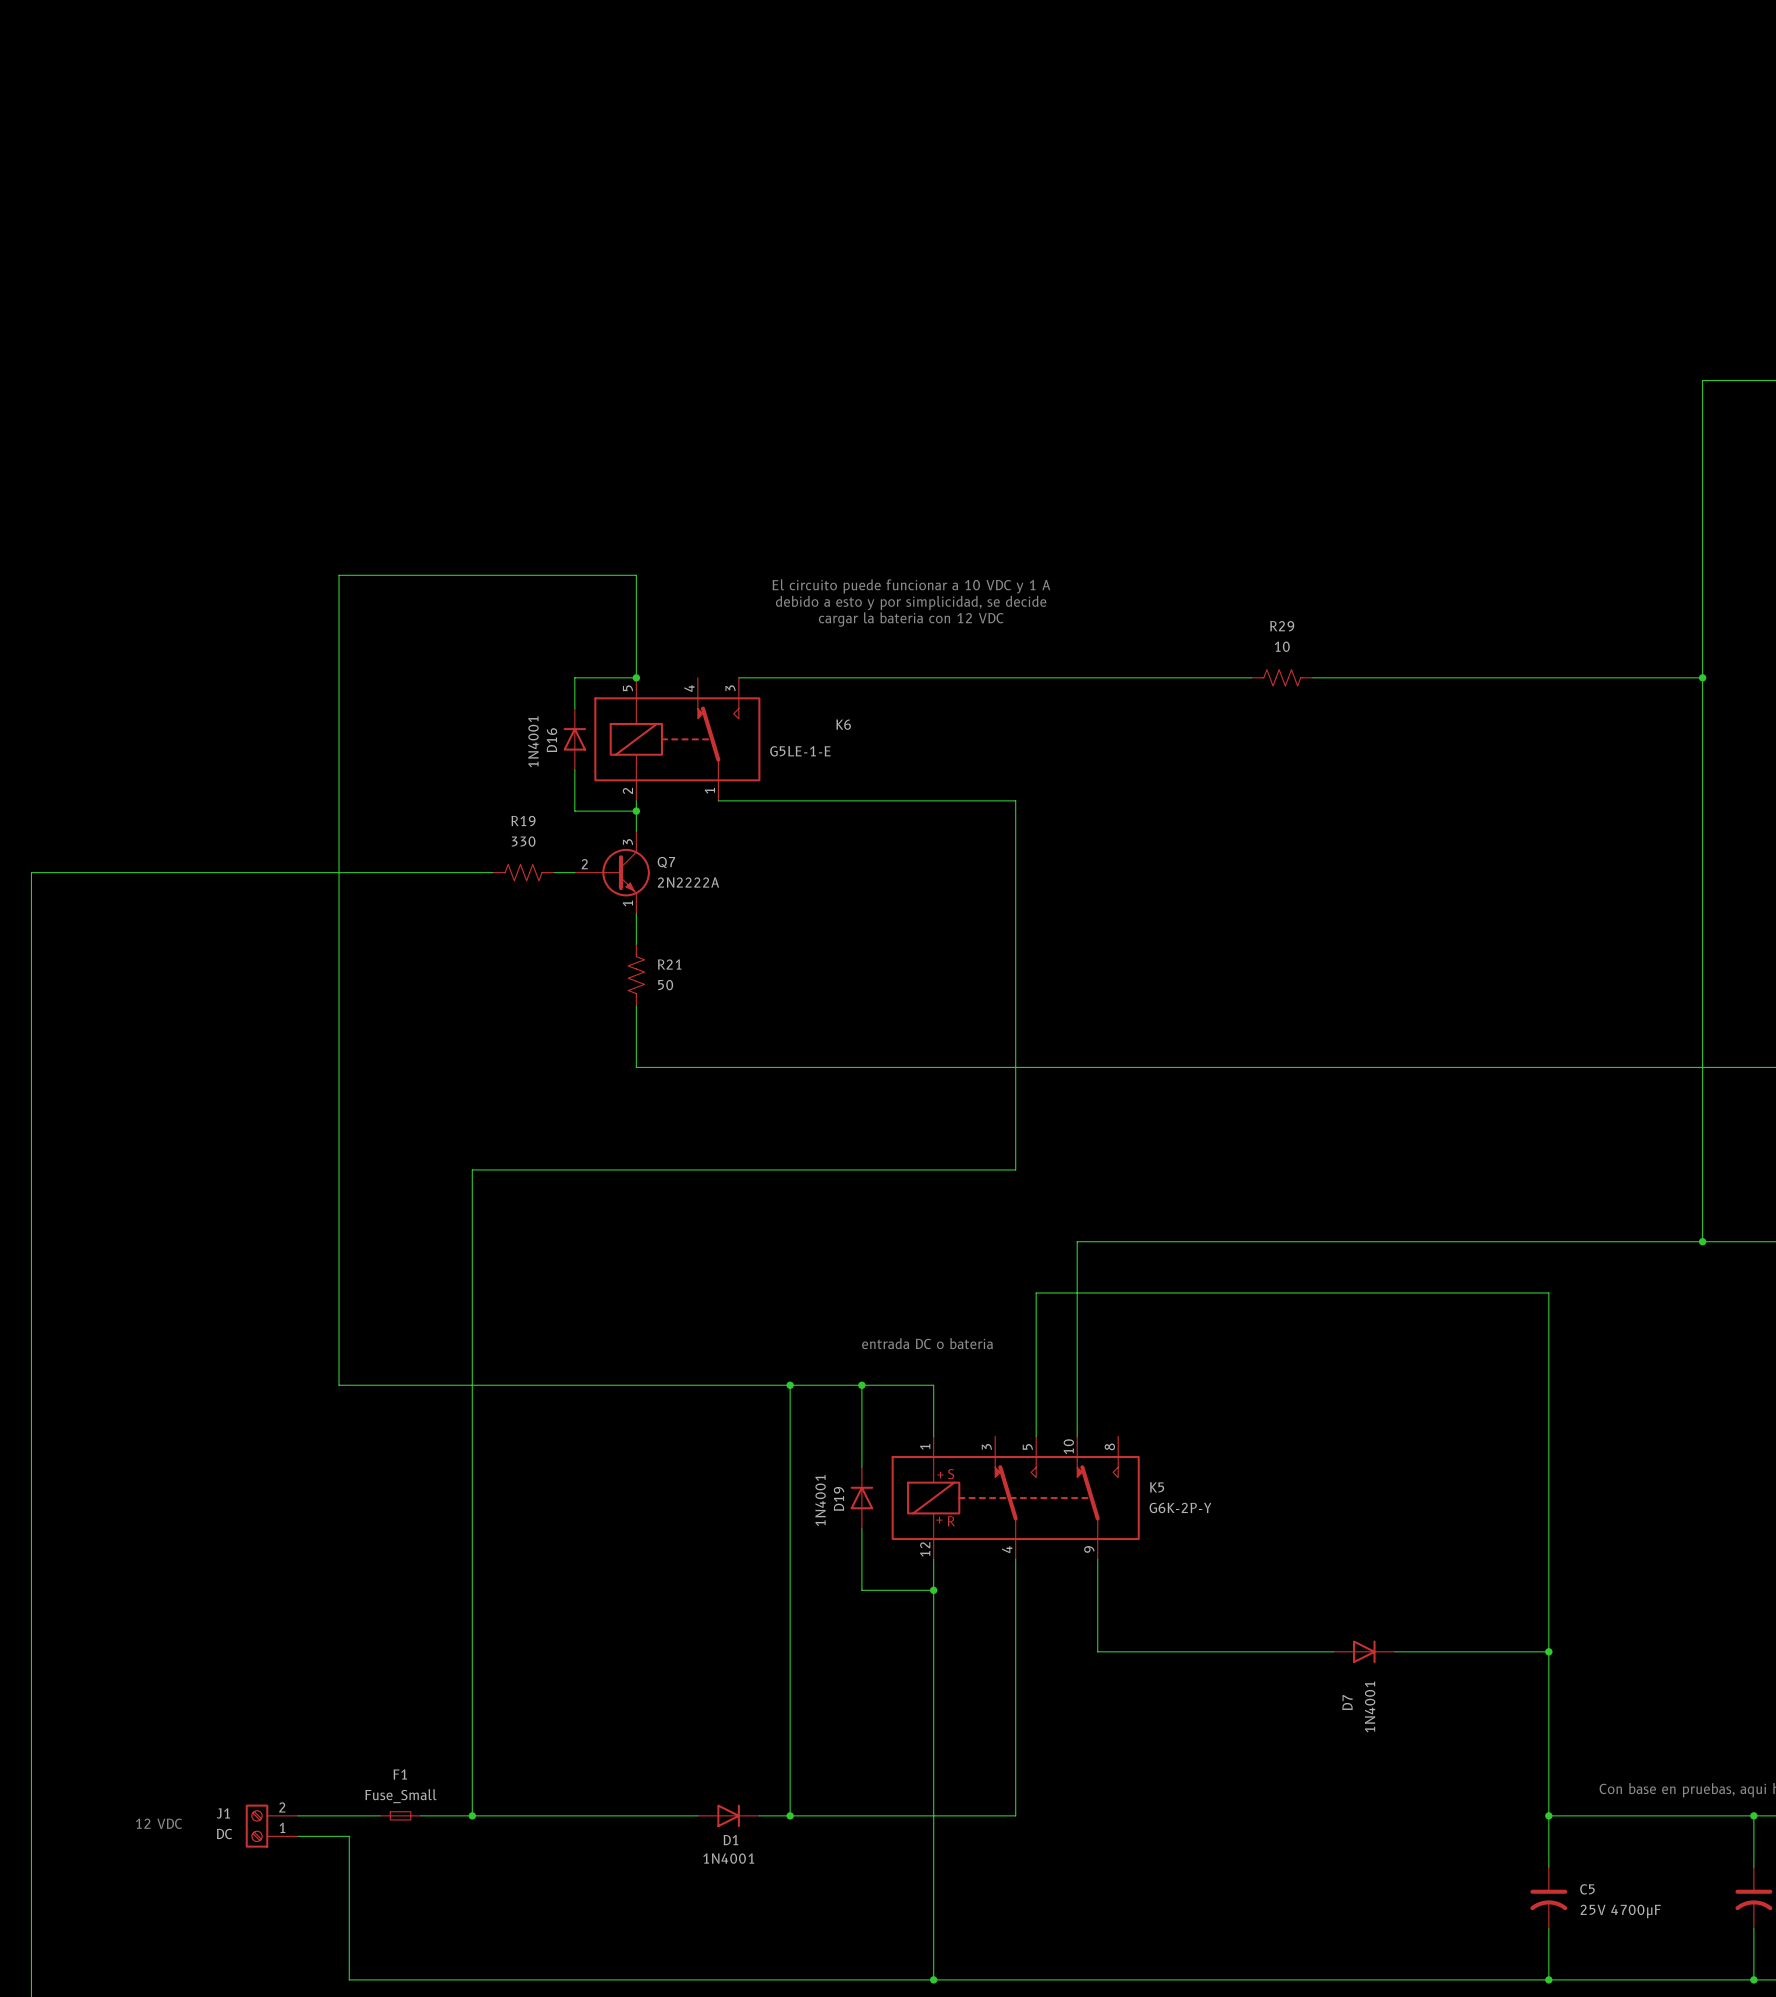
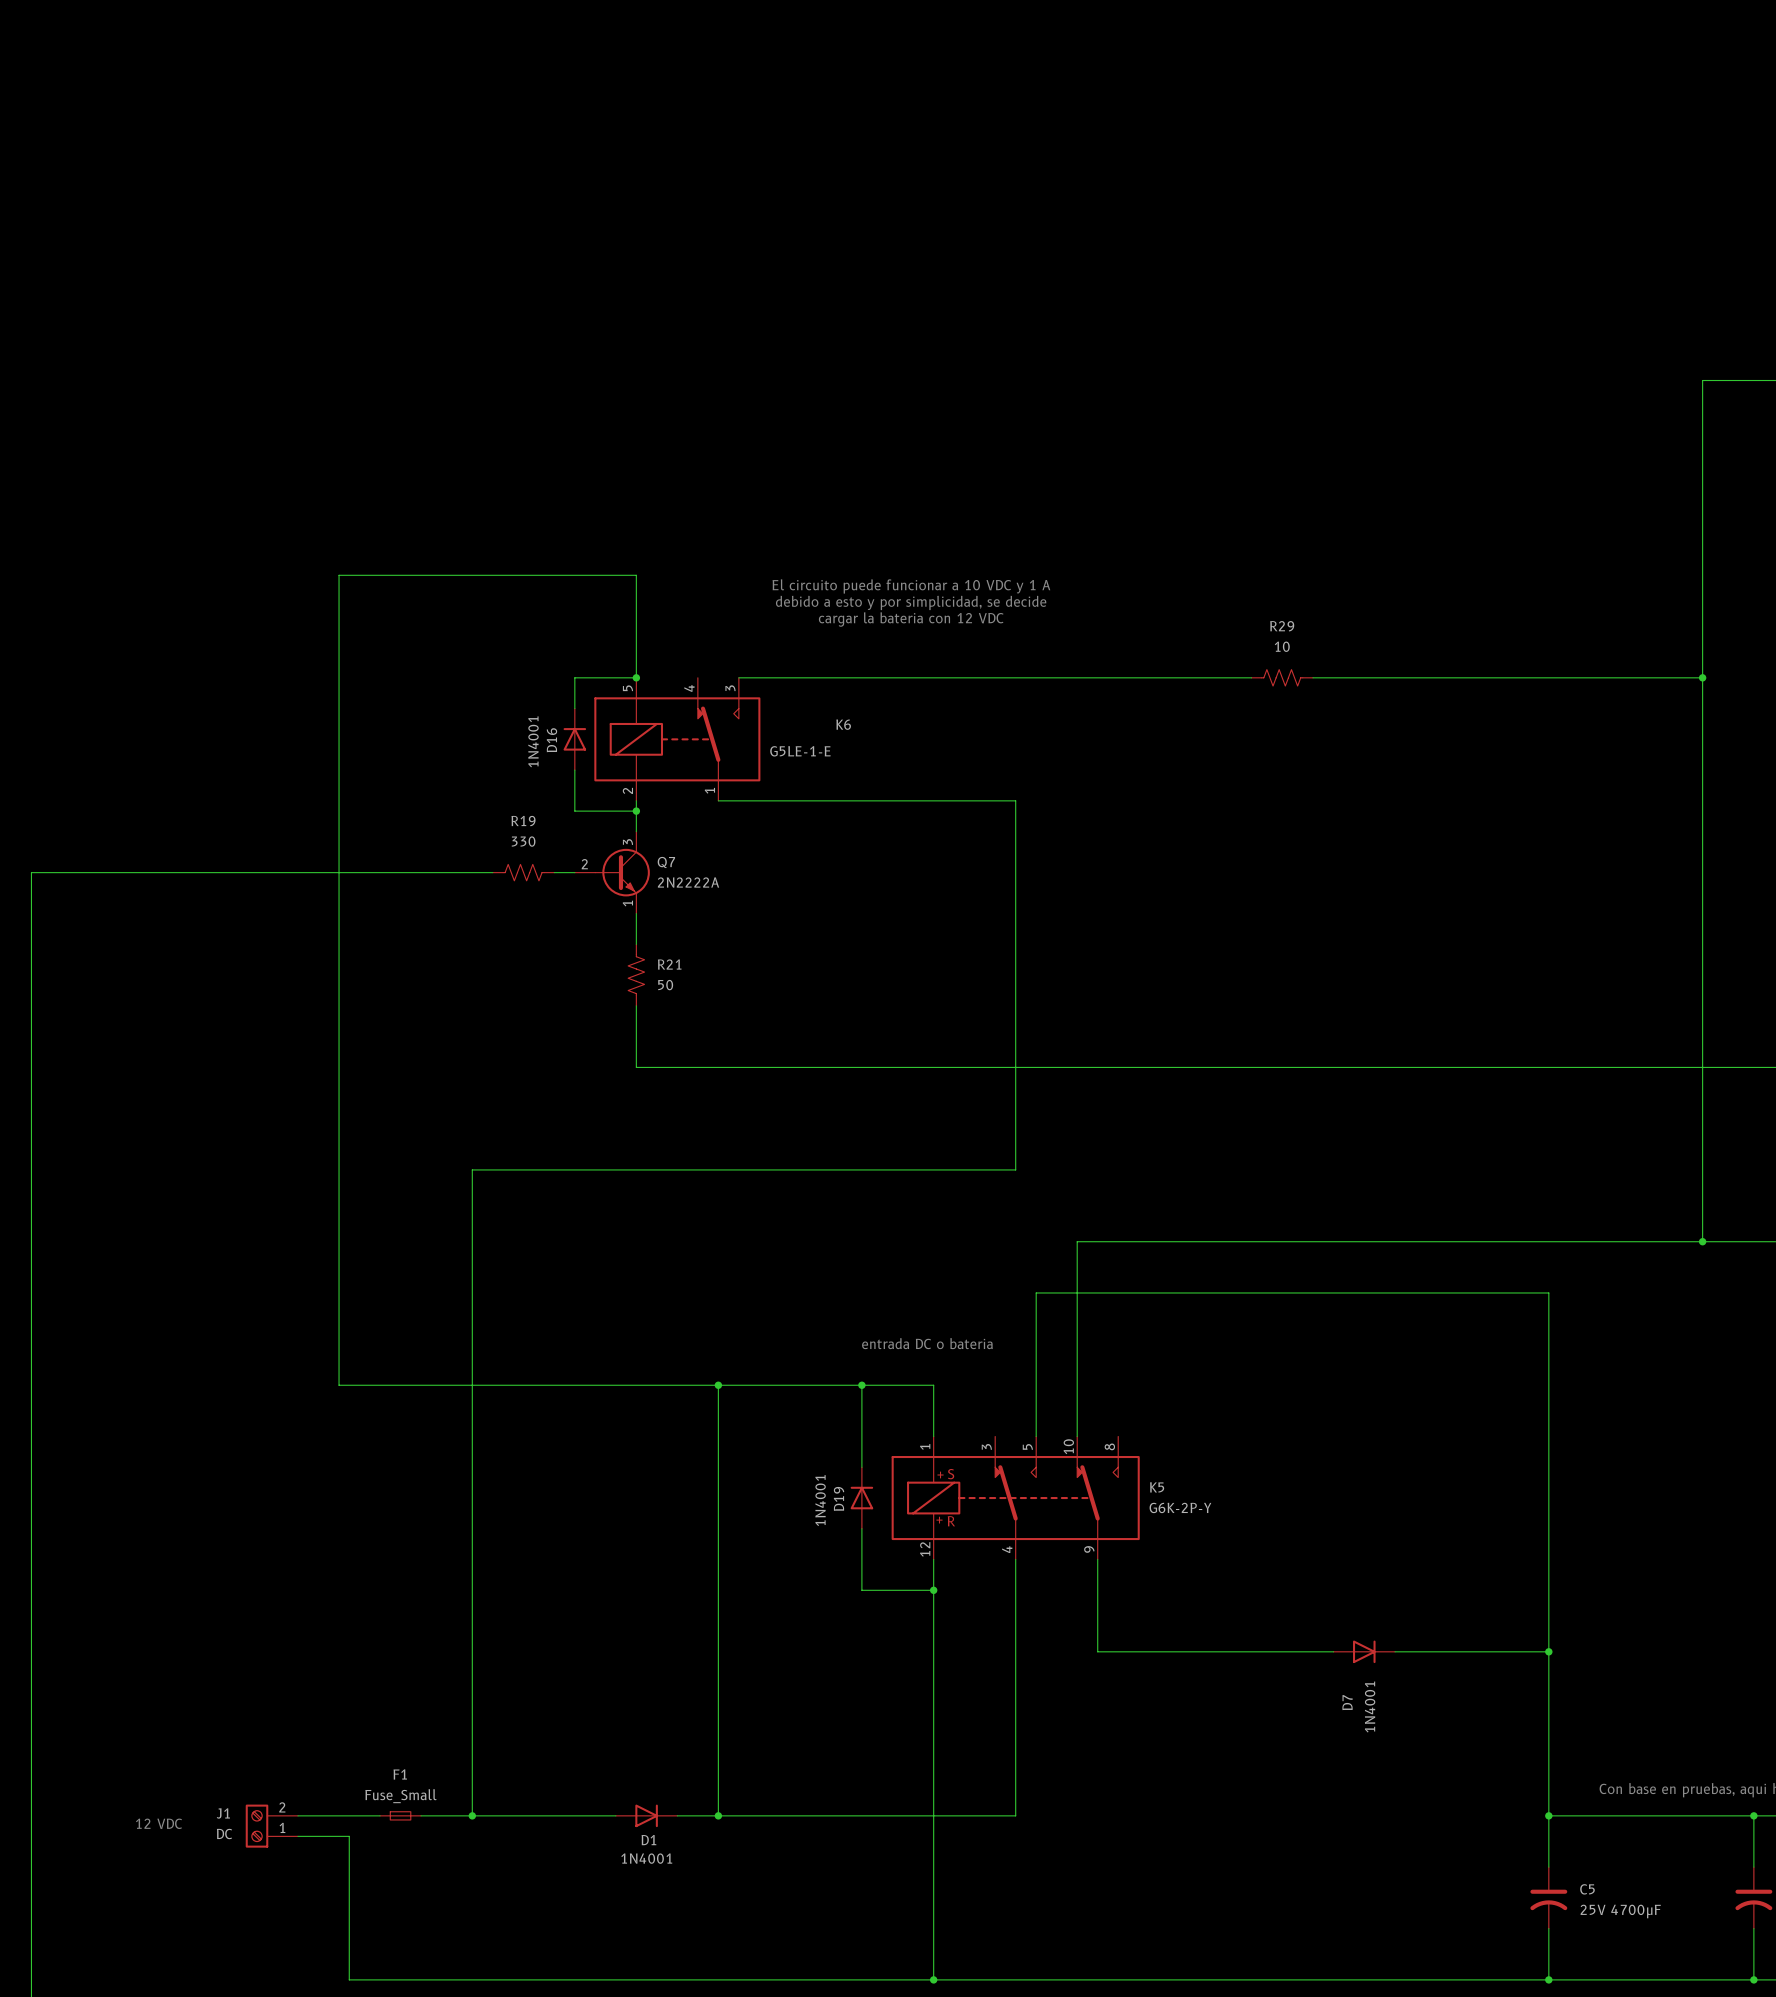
junction: none -> (718, 1385)
wire: (790, 1385) (790, 1815) -> (718, 1385) (718, 1815)
junction: (790, 1385) -> none
junction: none -> (718, 1815)
D1 position: (728, 1815) -> (646, 1815)
junction: (790, 1815) -> none

